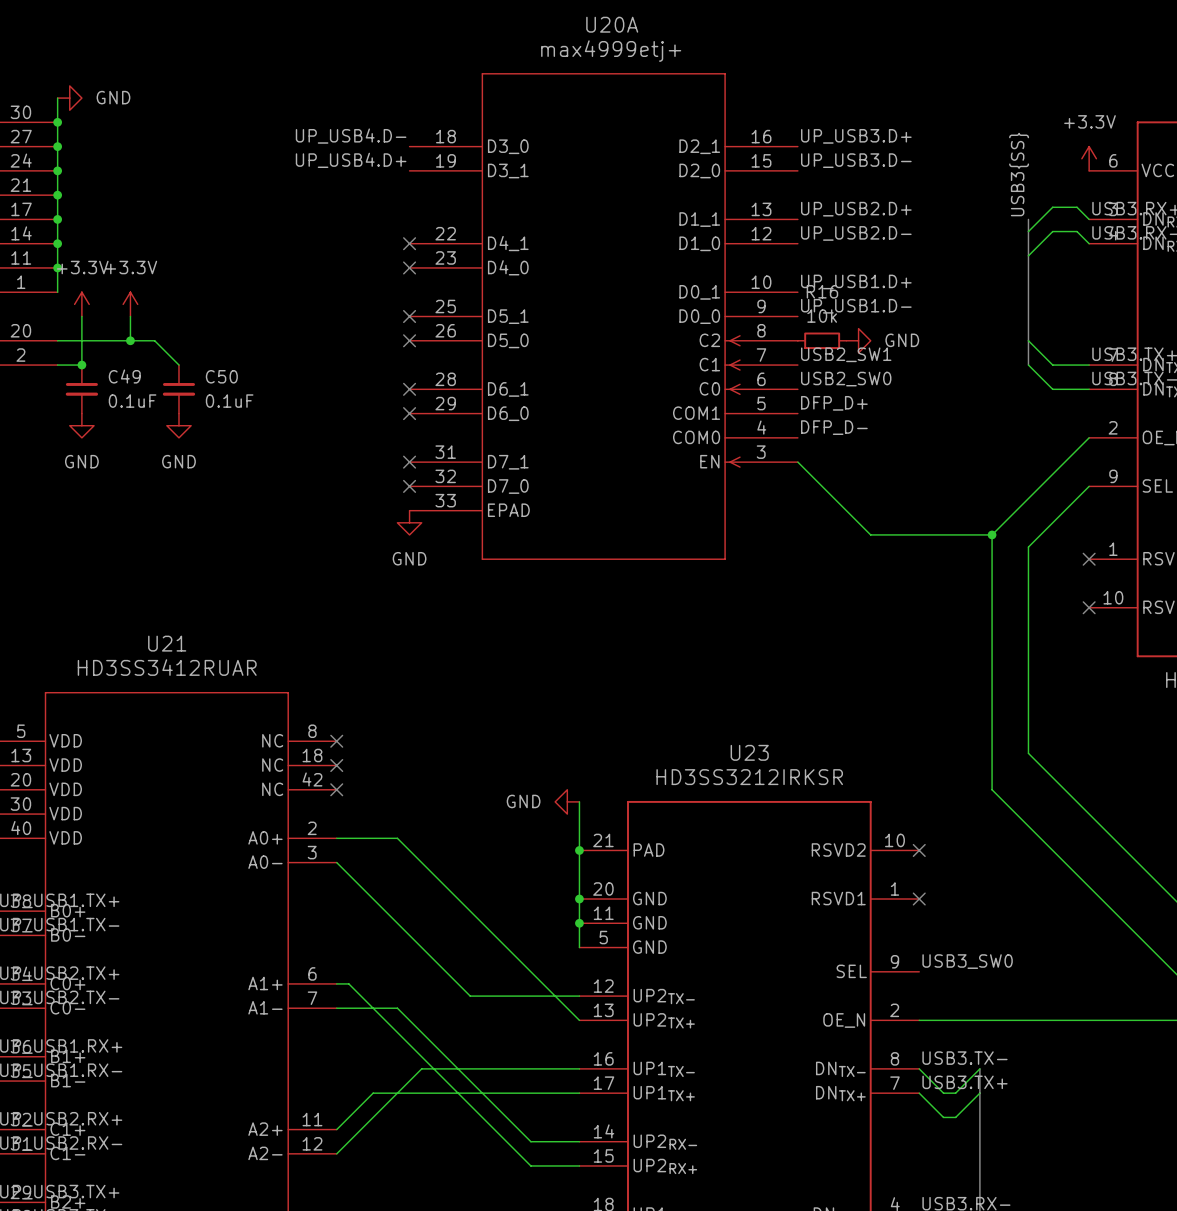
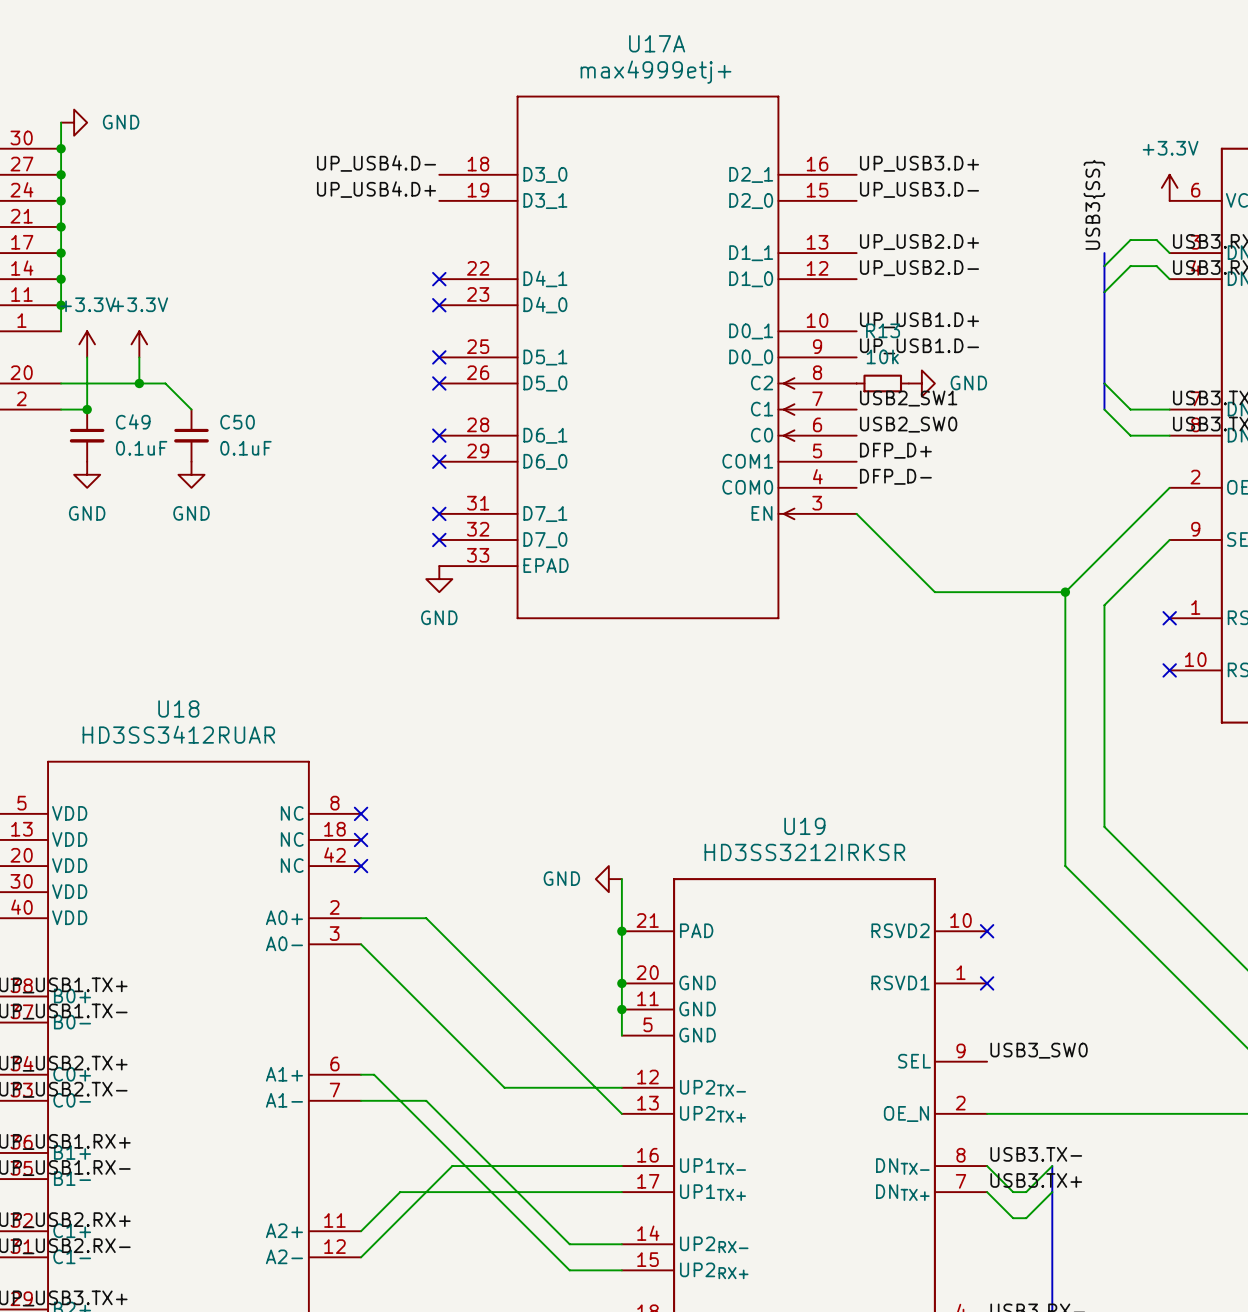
U20A name: U20A (612, 24) -> U17A (657, 43)
R16 name: R16 (822, 291) -> R13 (883, 330)
U21 name: U21 (167, 643) -> U18 (178, 708)
U23 name: U23 (749, 752) -> U19 (804, 826)

